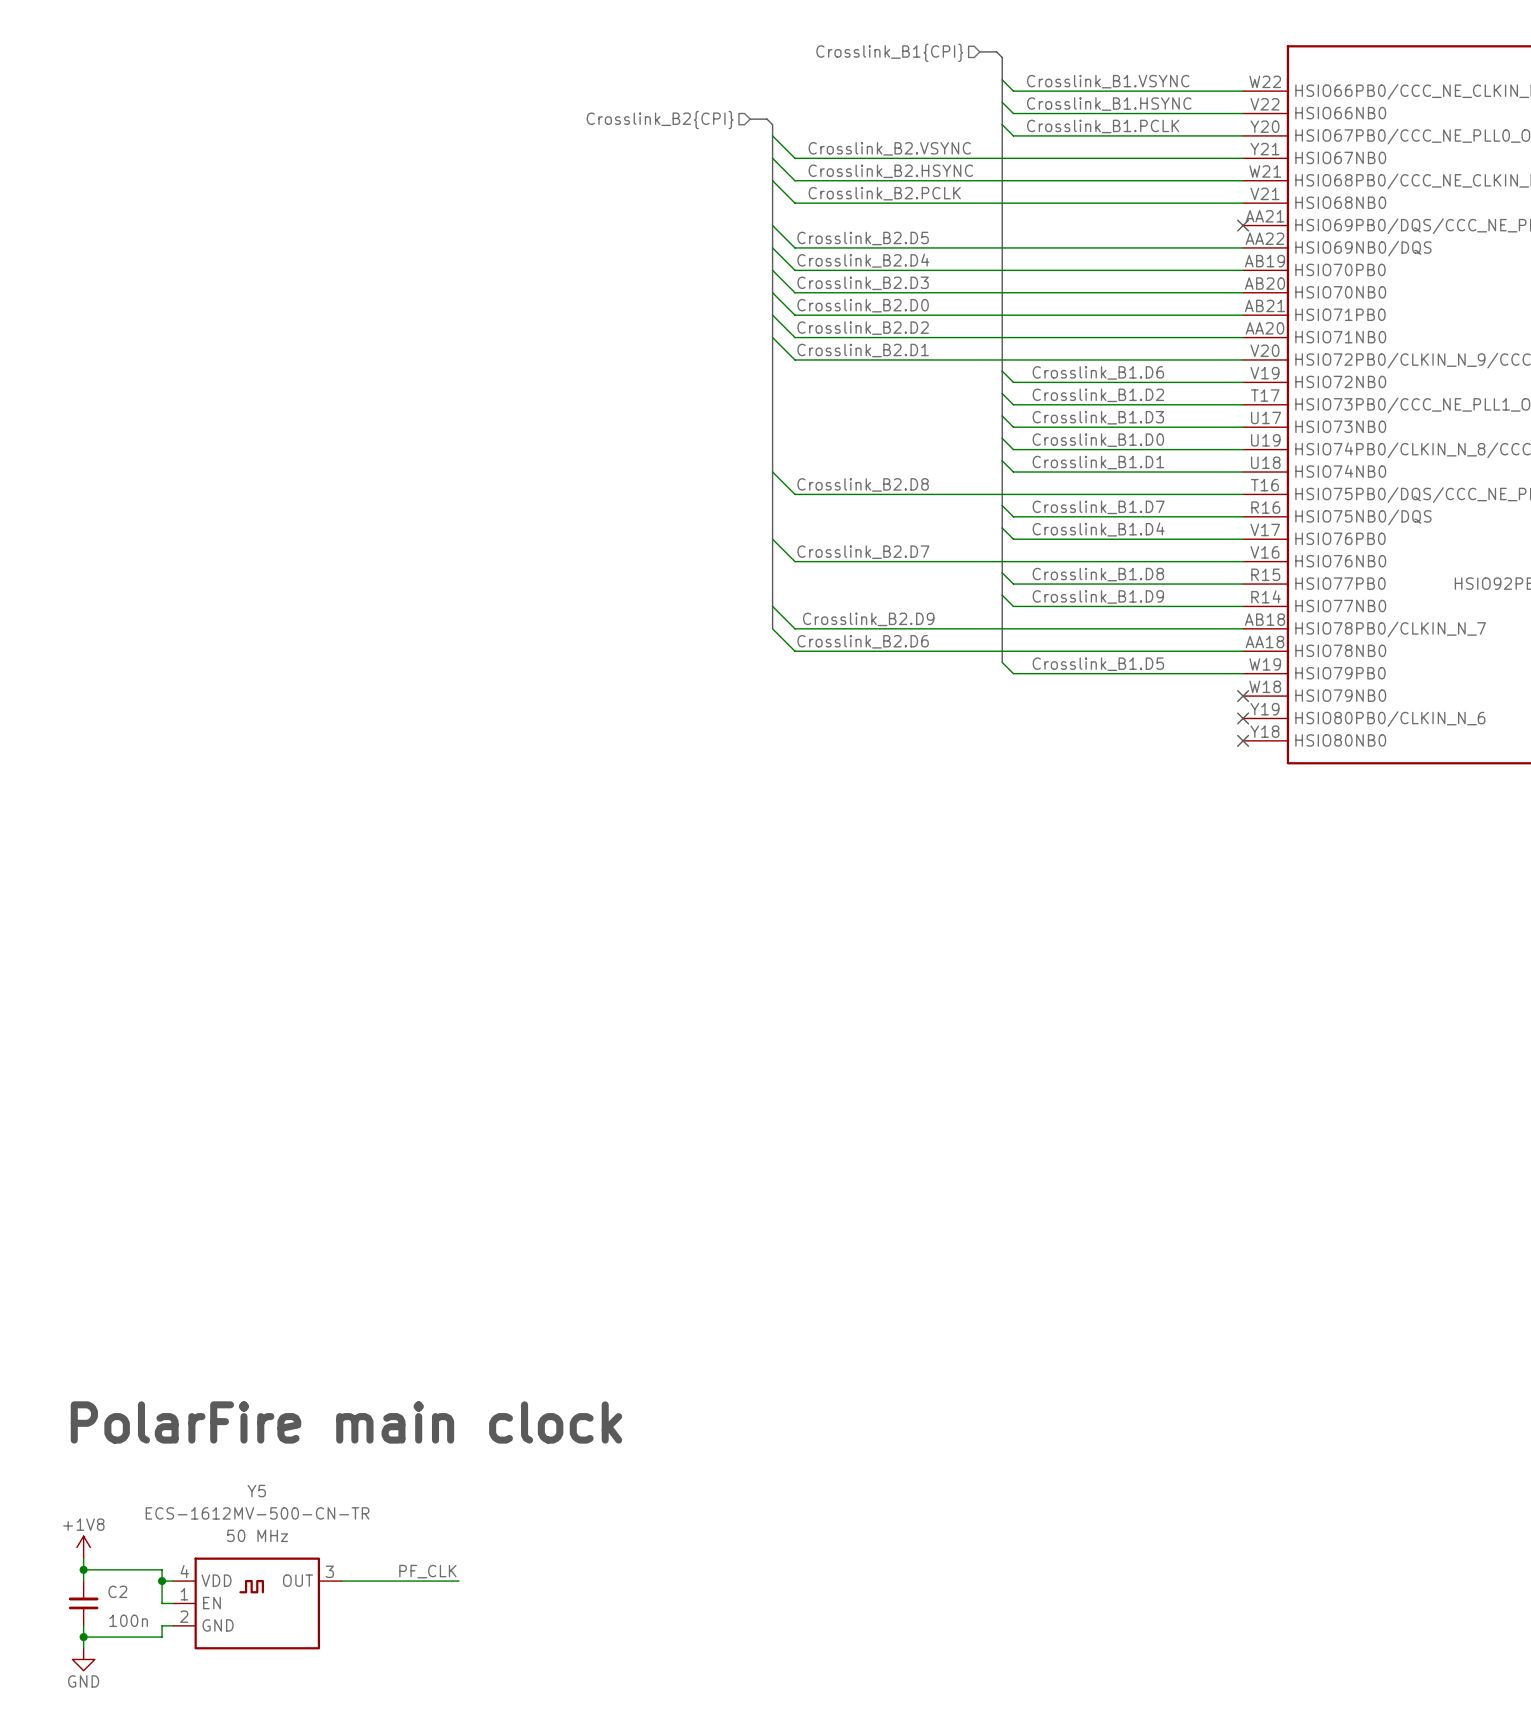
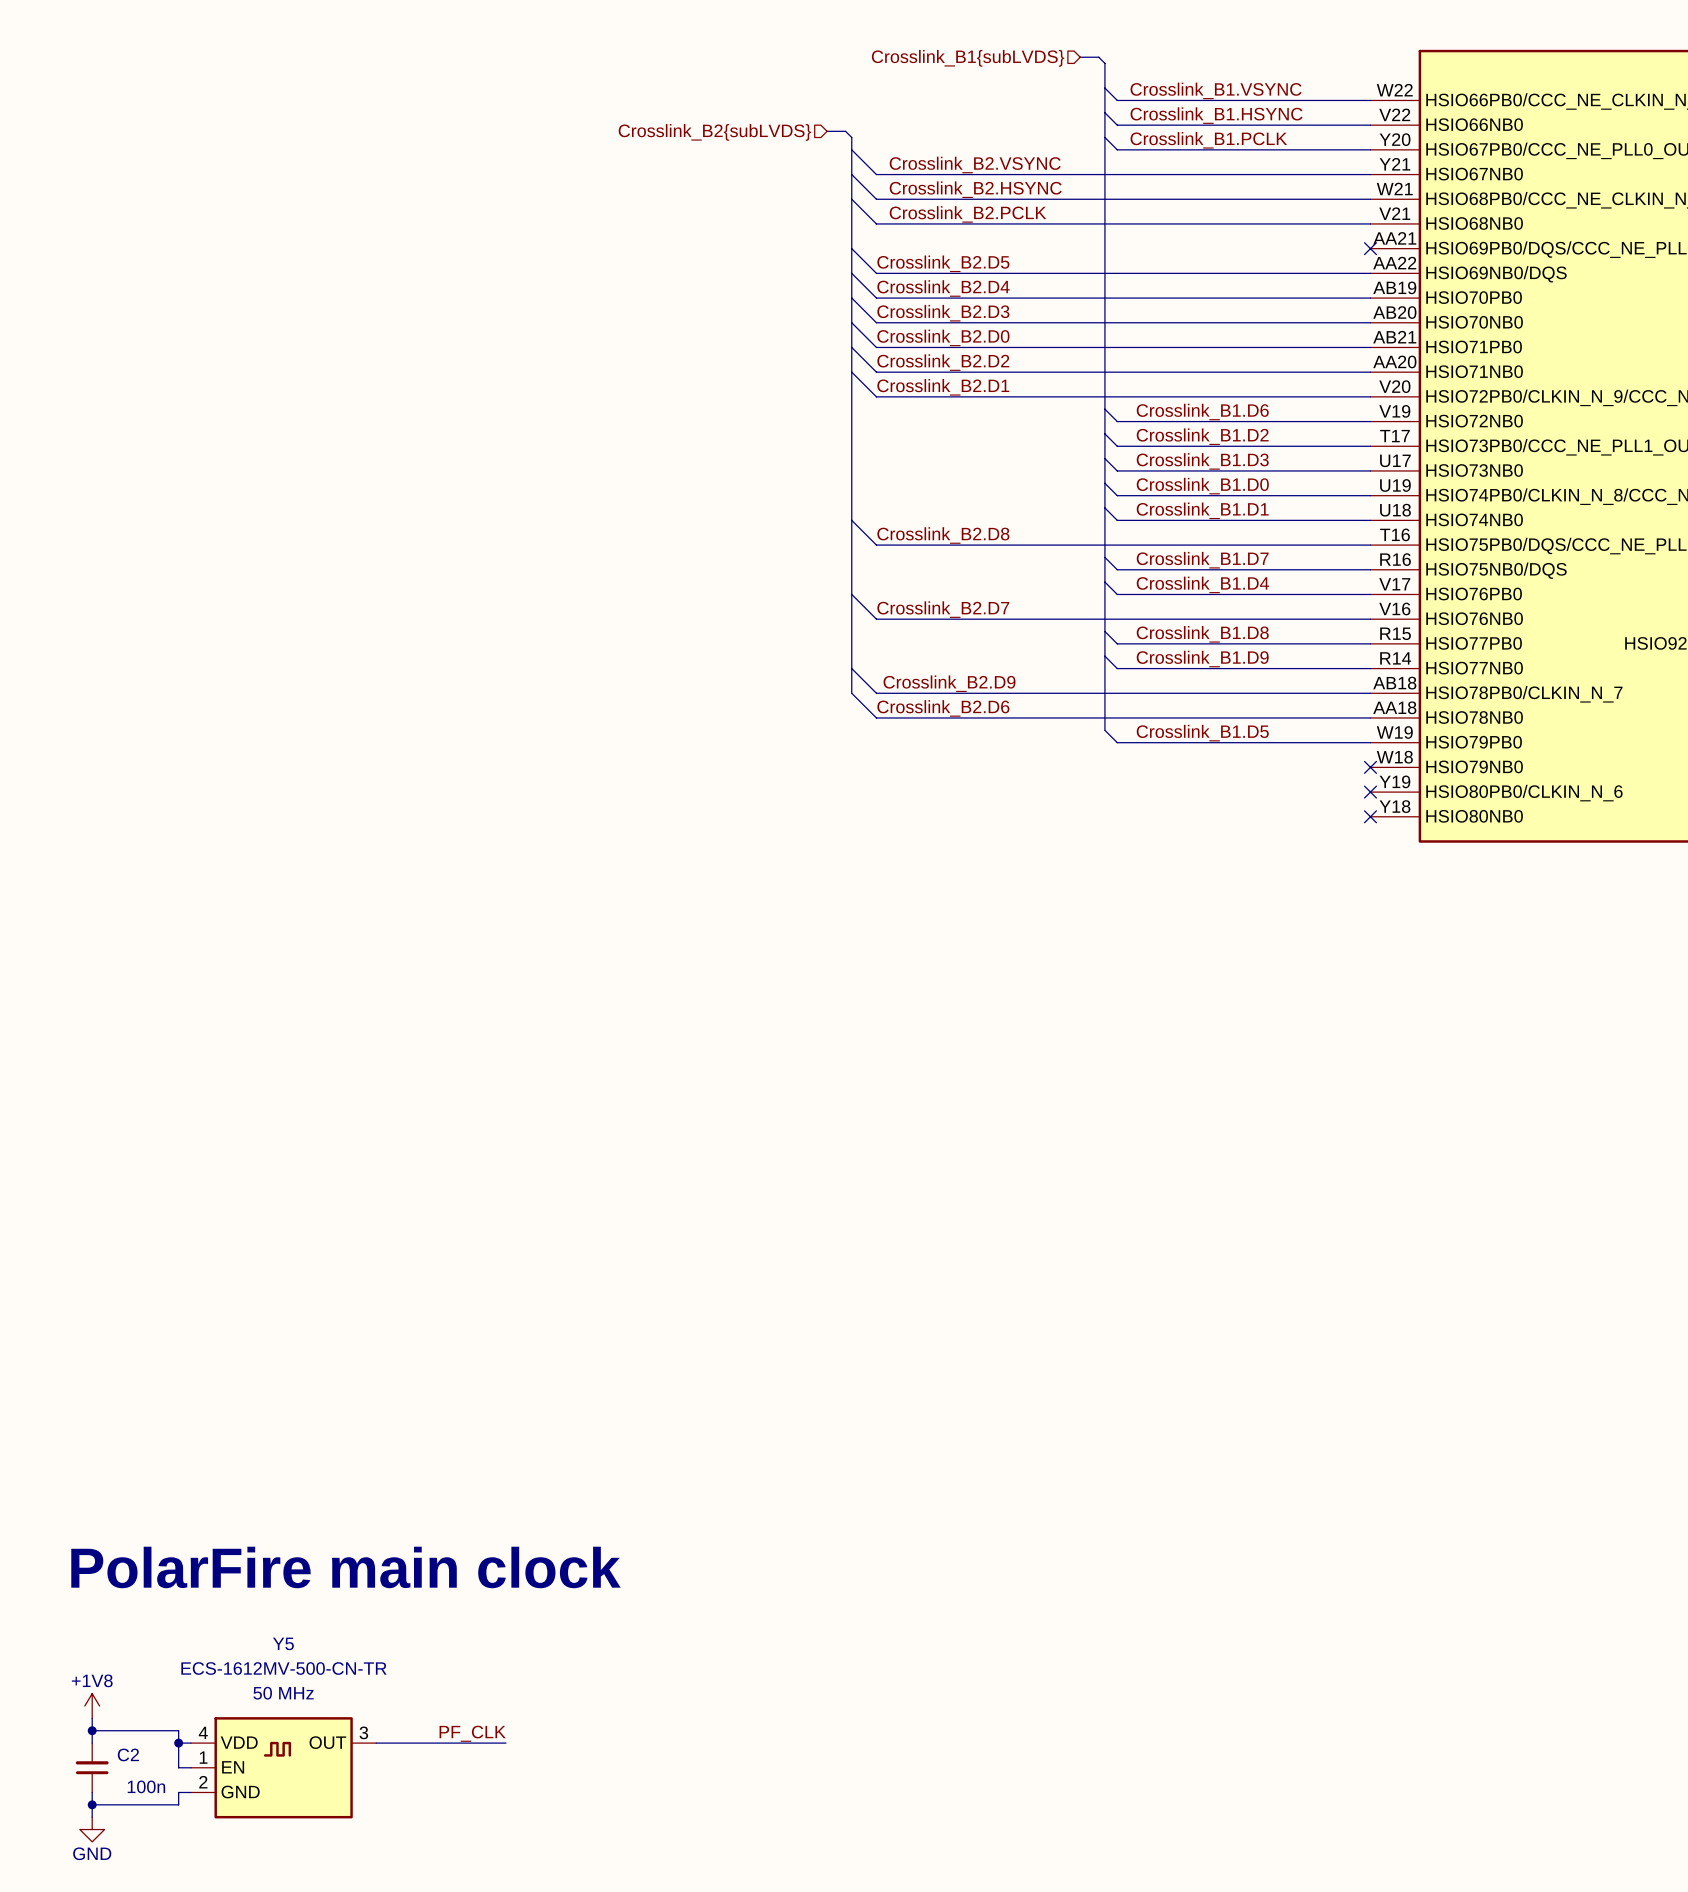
hierarchical label: Crosslink_B1{CPI} (889, 52) -> Crosslink_B1{subLVDS} (968, 58)
hierarchical label: Crosslink_B2{CPI} (660, 120) -> Crosslink_B2{subLVDS} (714, 132)

